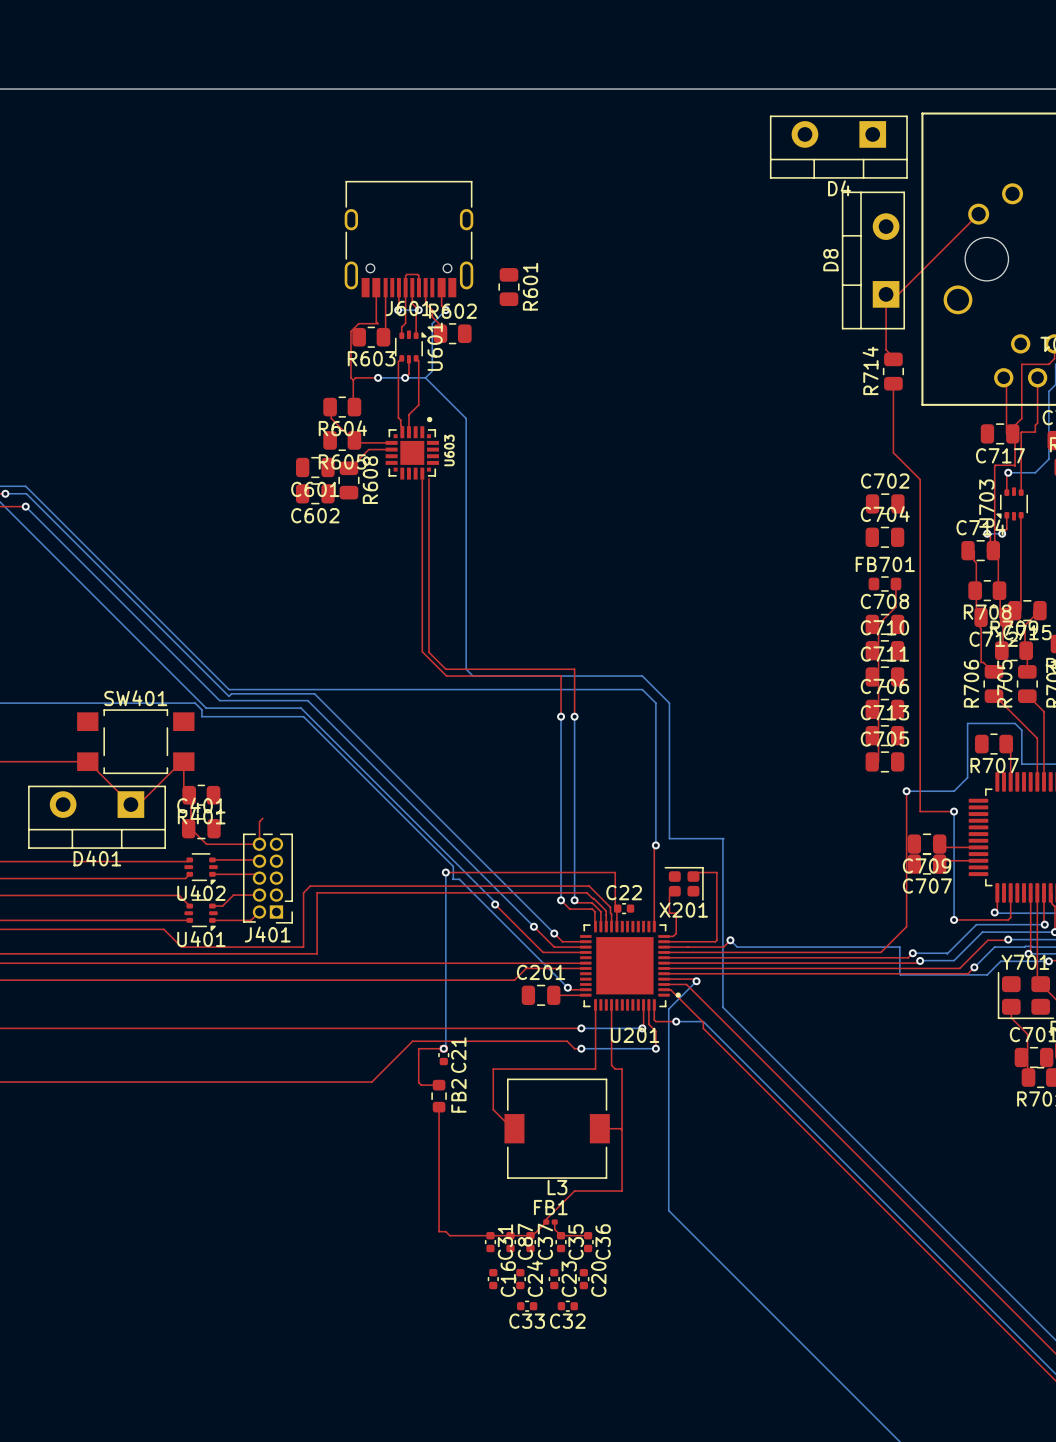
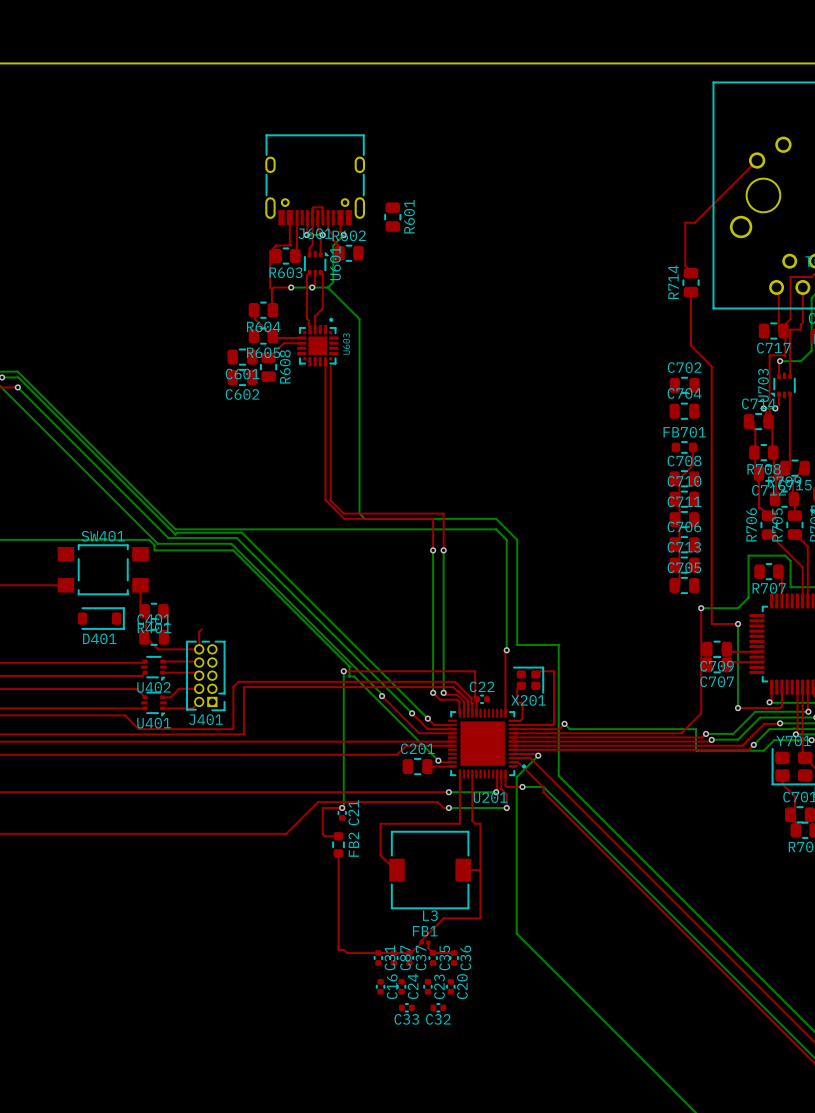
D4: (838, 147) -> none
D8: (873, 260) -> none
top track: (88, 761) (130, 804) (138, 804) (181, 761) -> none
D401 footprint: [28, 785, 167, 849] -> [77, 607, 125, 630]

